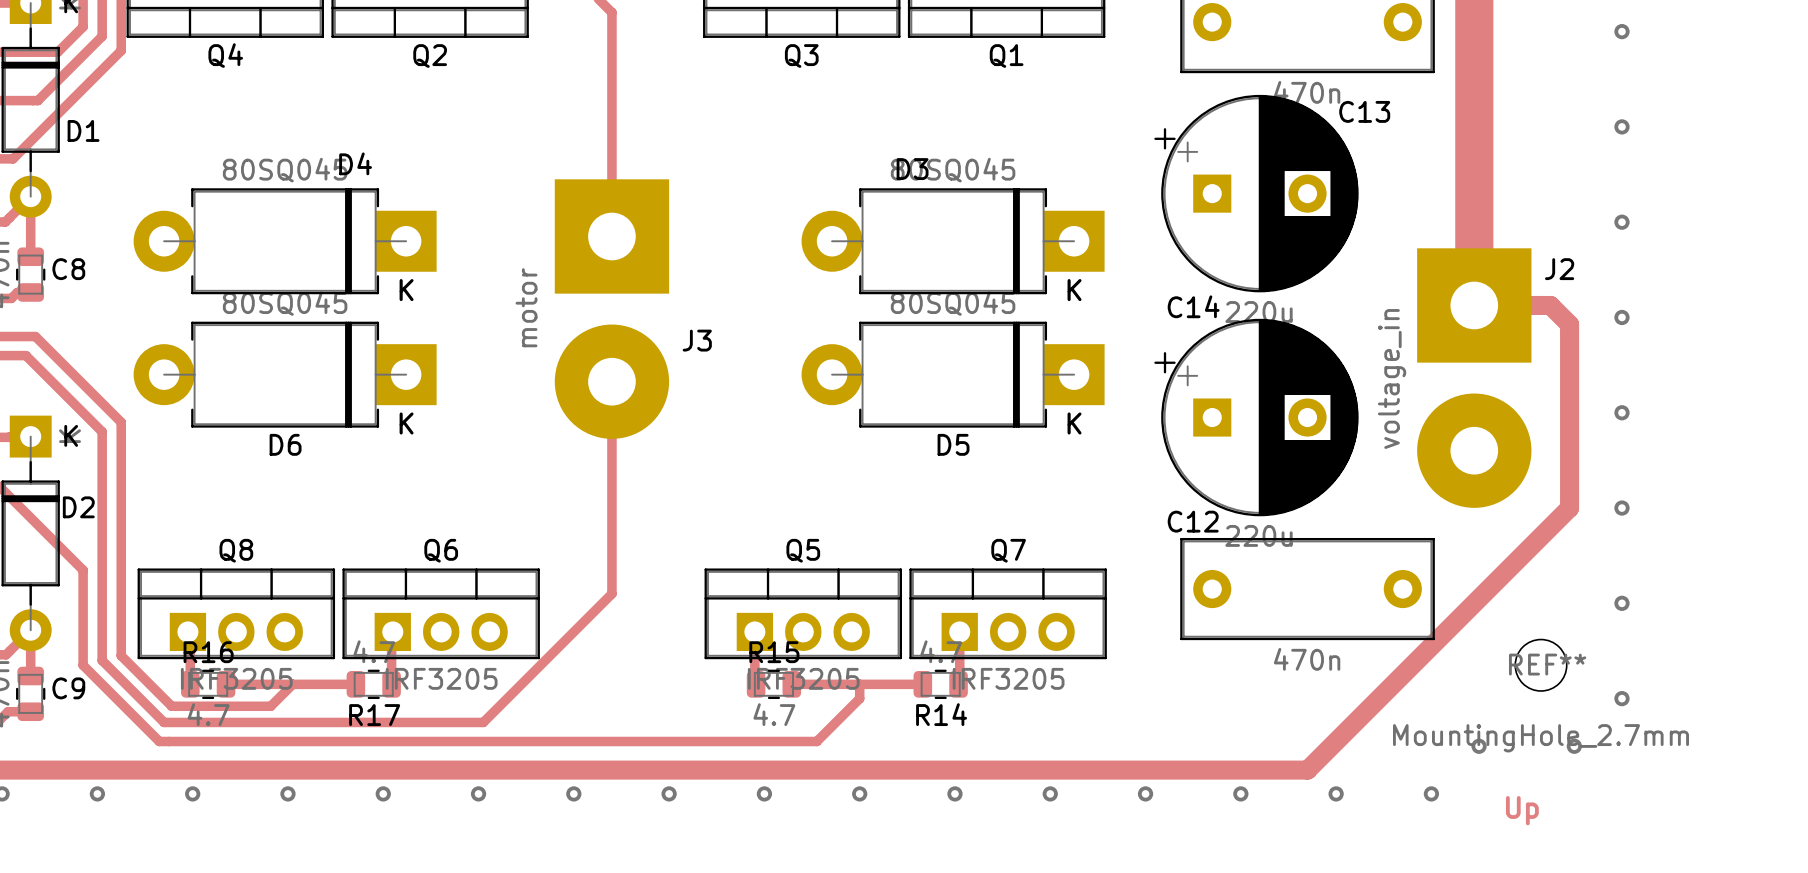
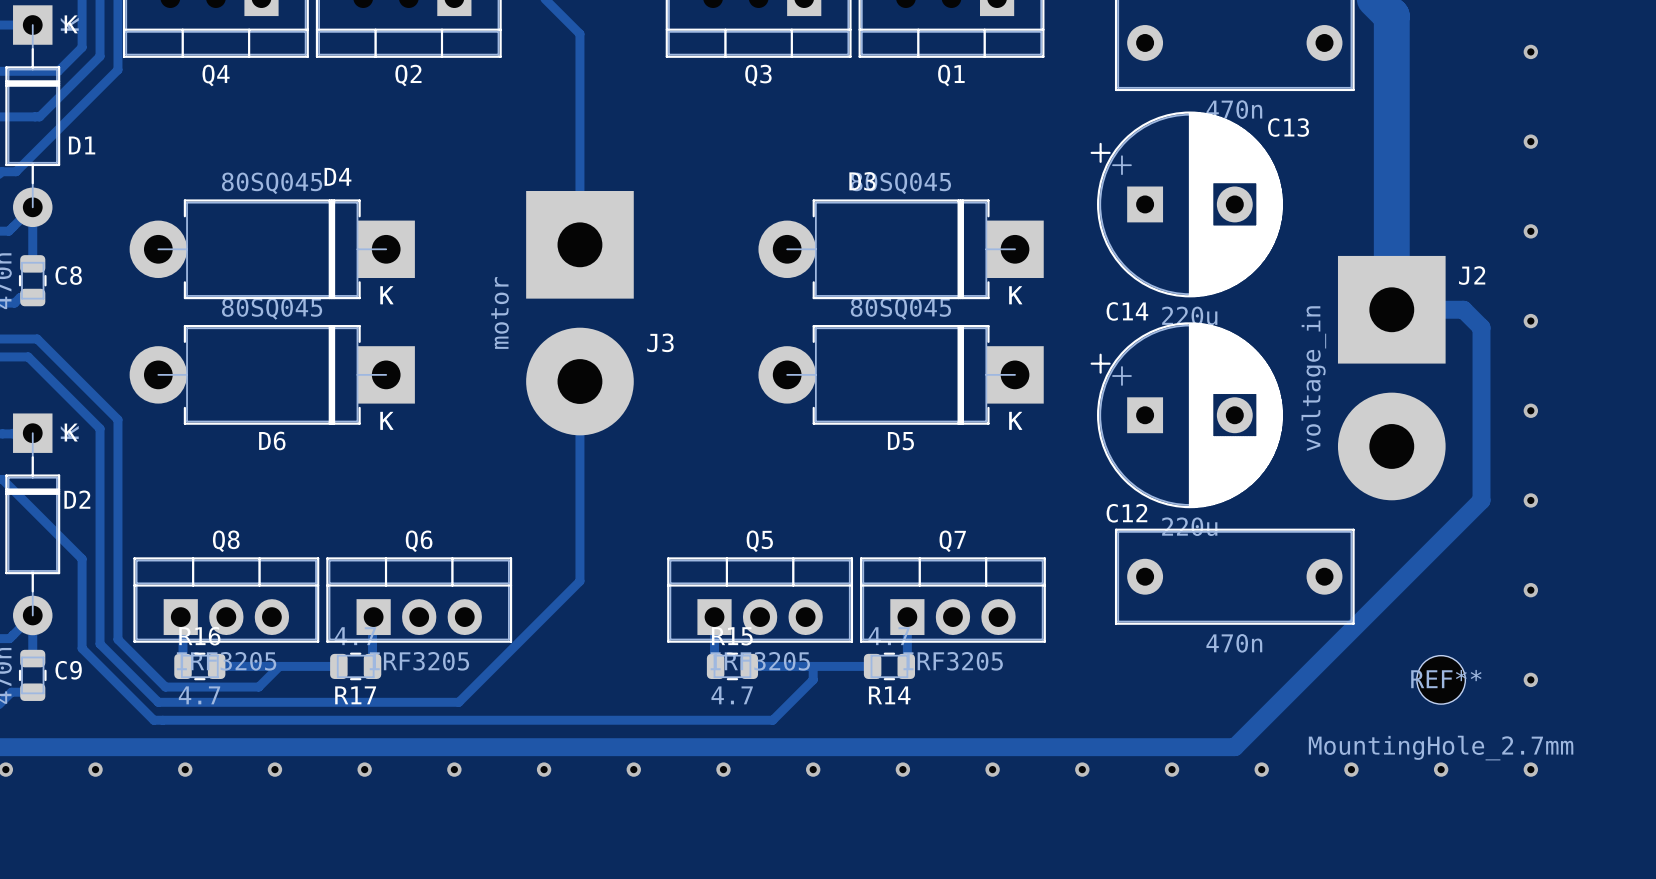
REF** position: (1540, 665) -> (1441, 679)
via: (1479, 746) -> none
via: (1574, 746) -> none
via: none -> (1441, 769)
via: none -> (1530, 769)
text: Up (1522, 810) -> none

